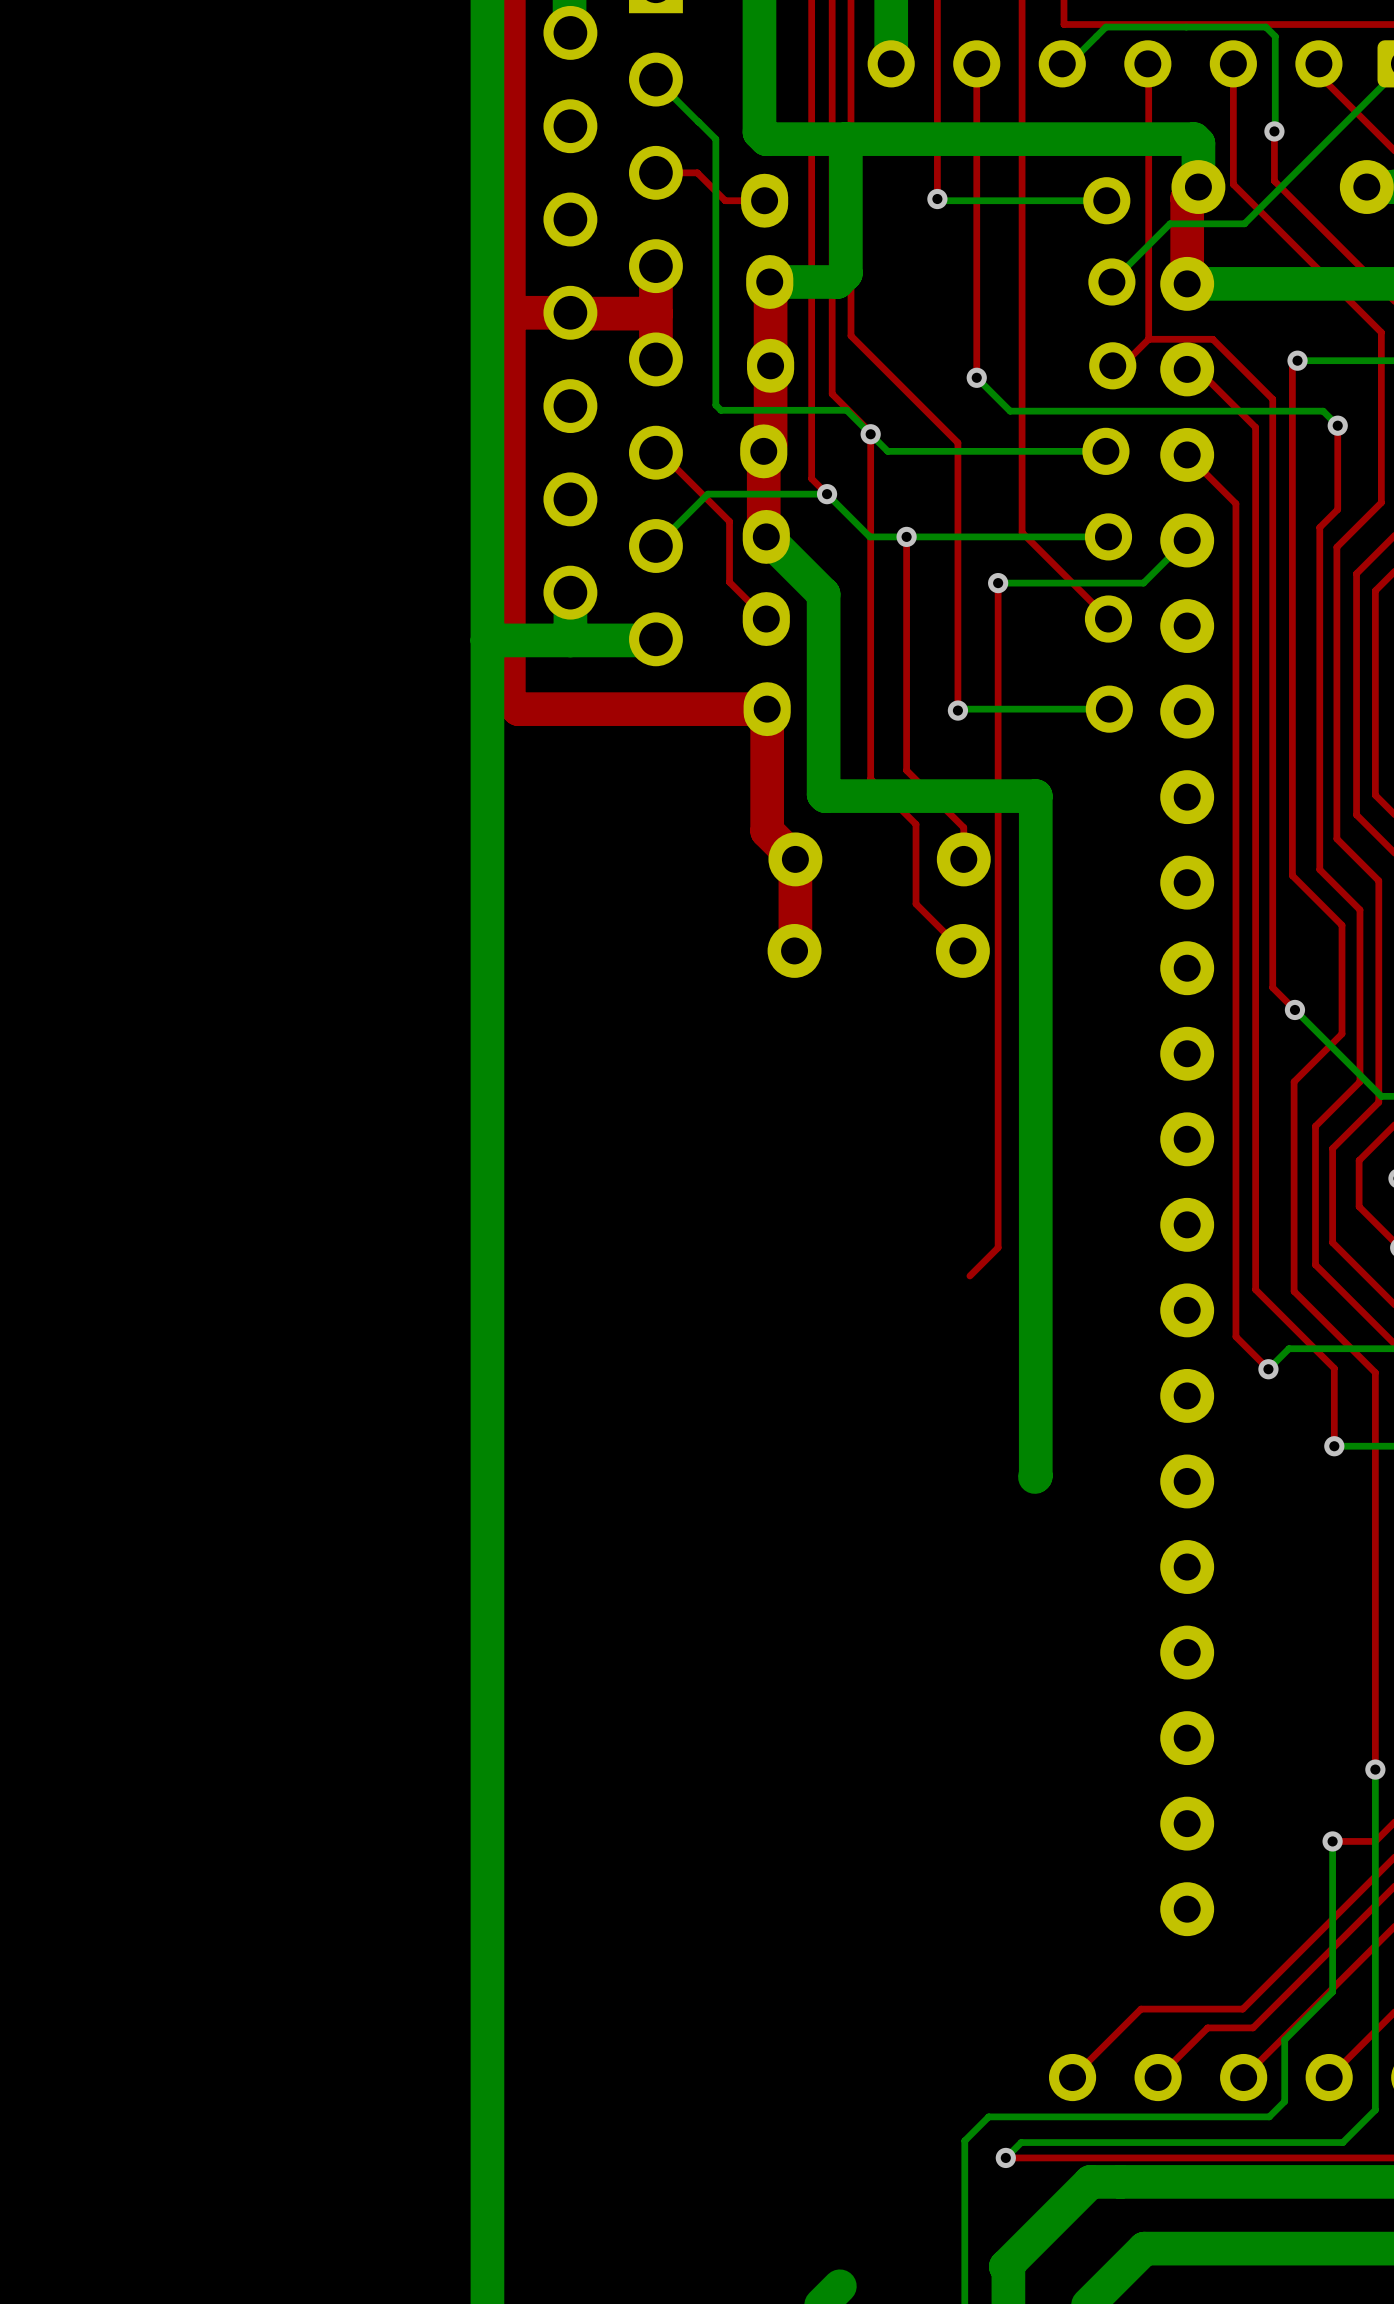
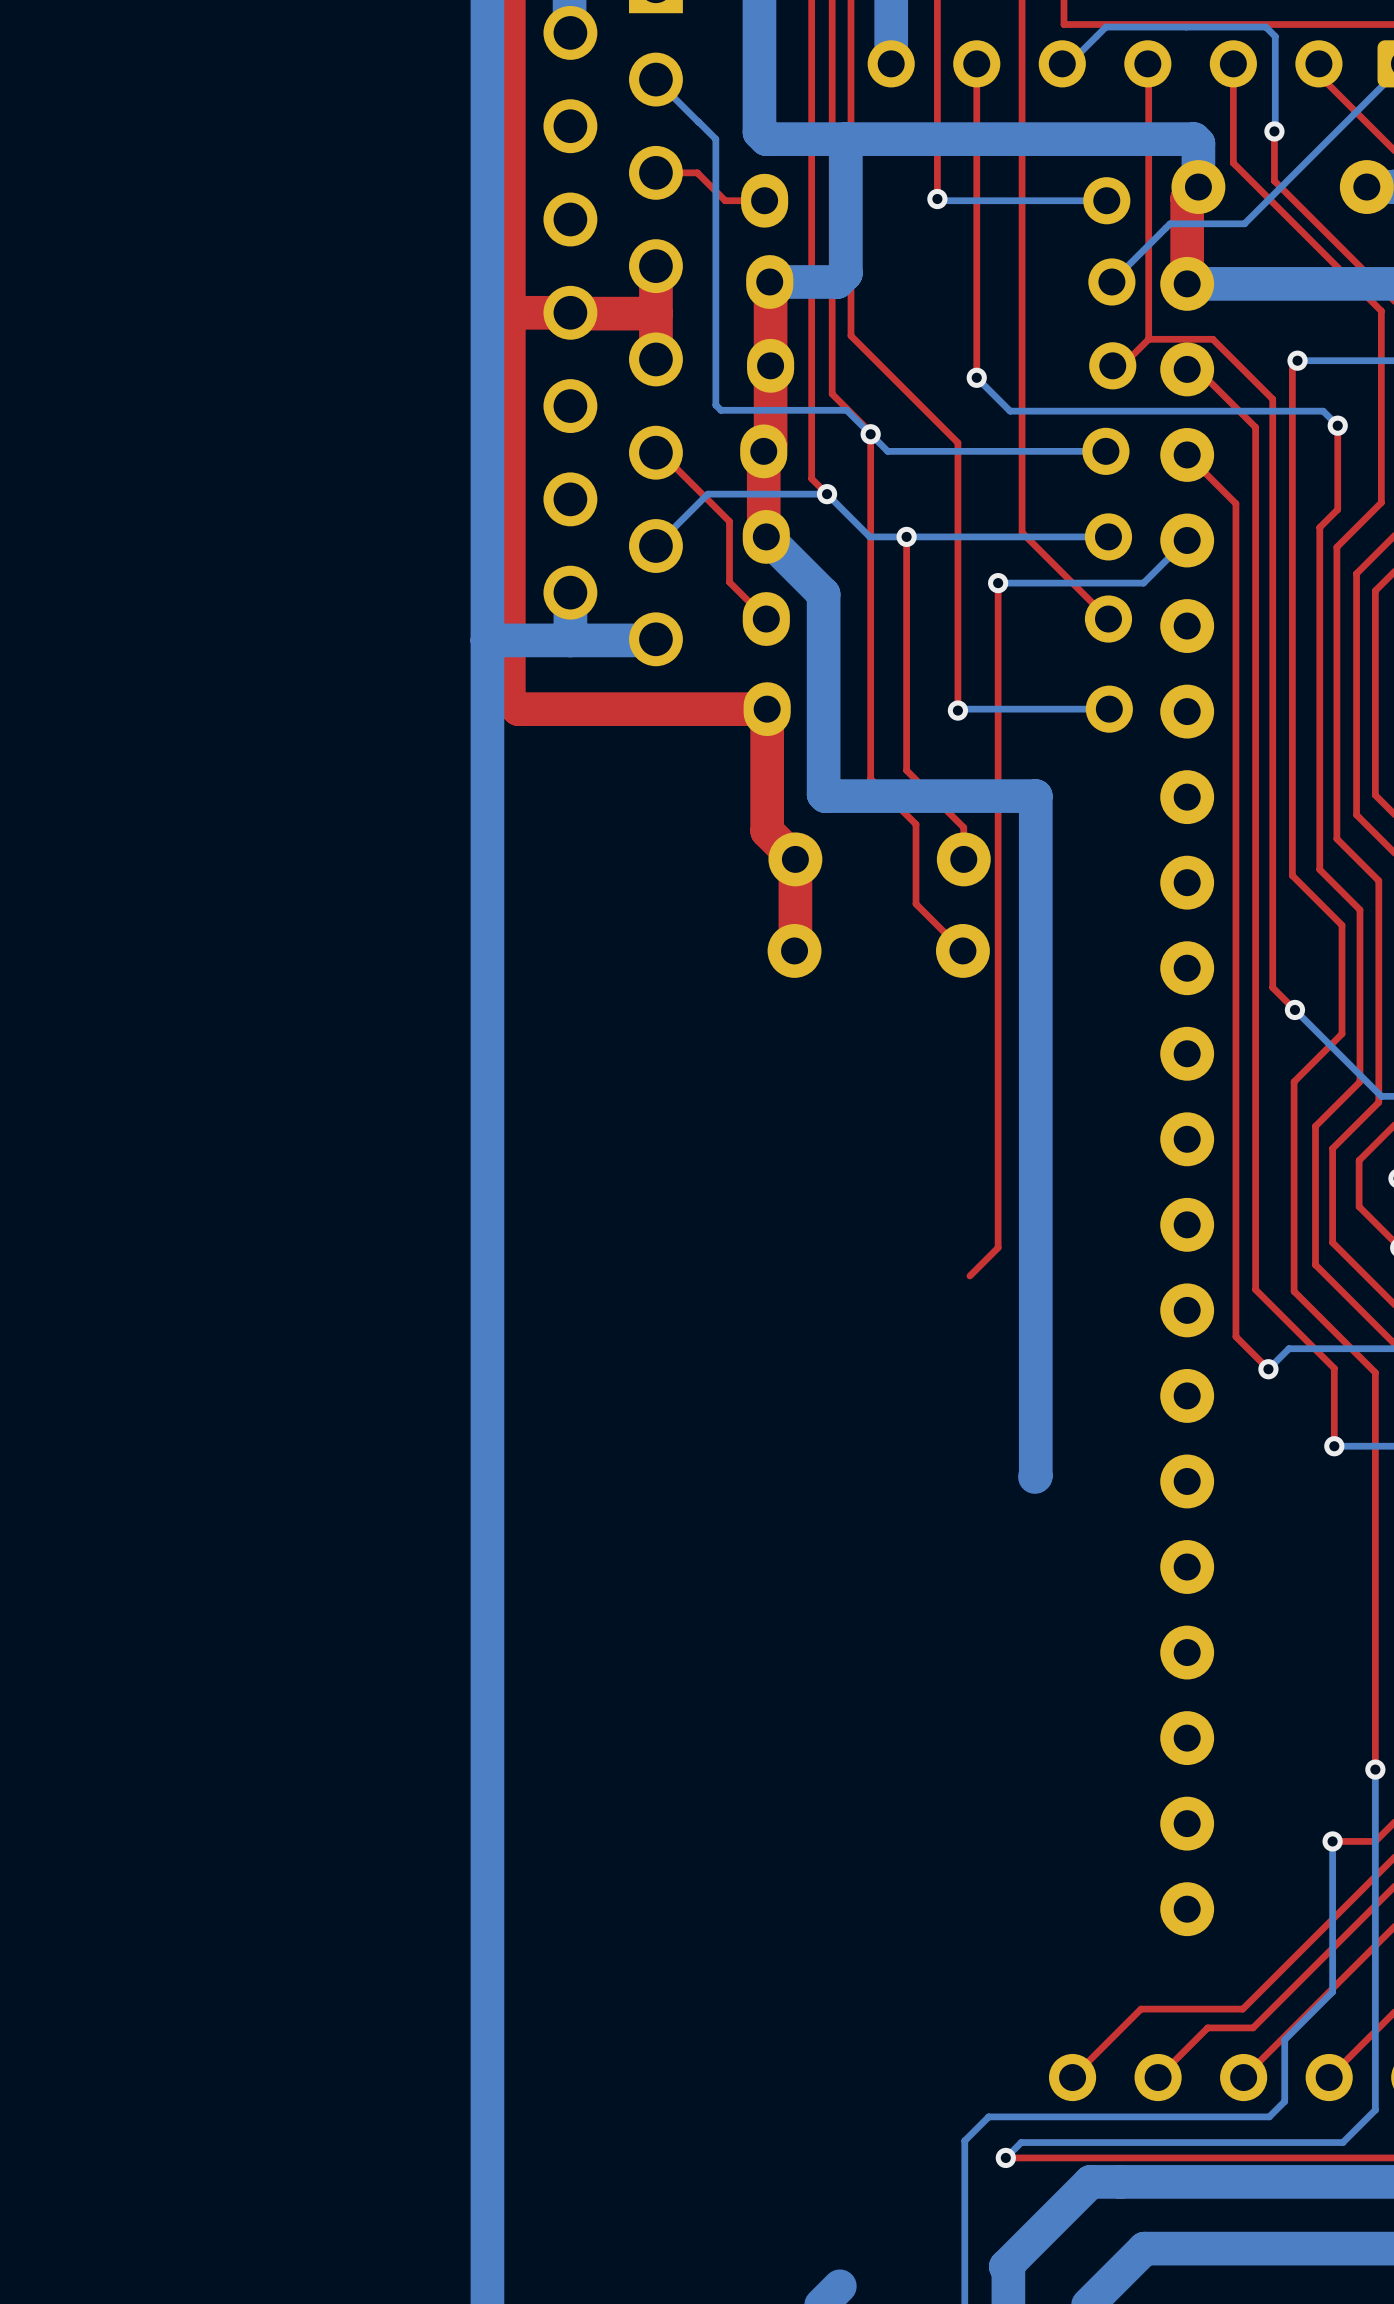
top track: (1233, 163) (1233, 184) (1381, 332) -> (1233, 163) (1381, 311) (1381, 332)

